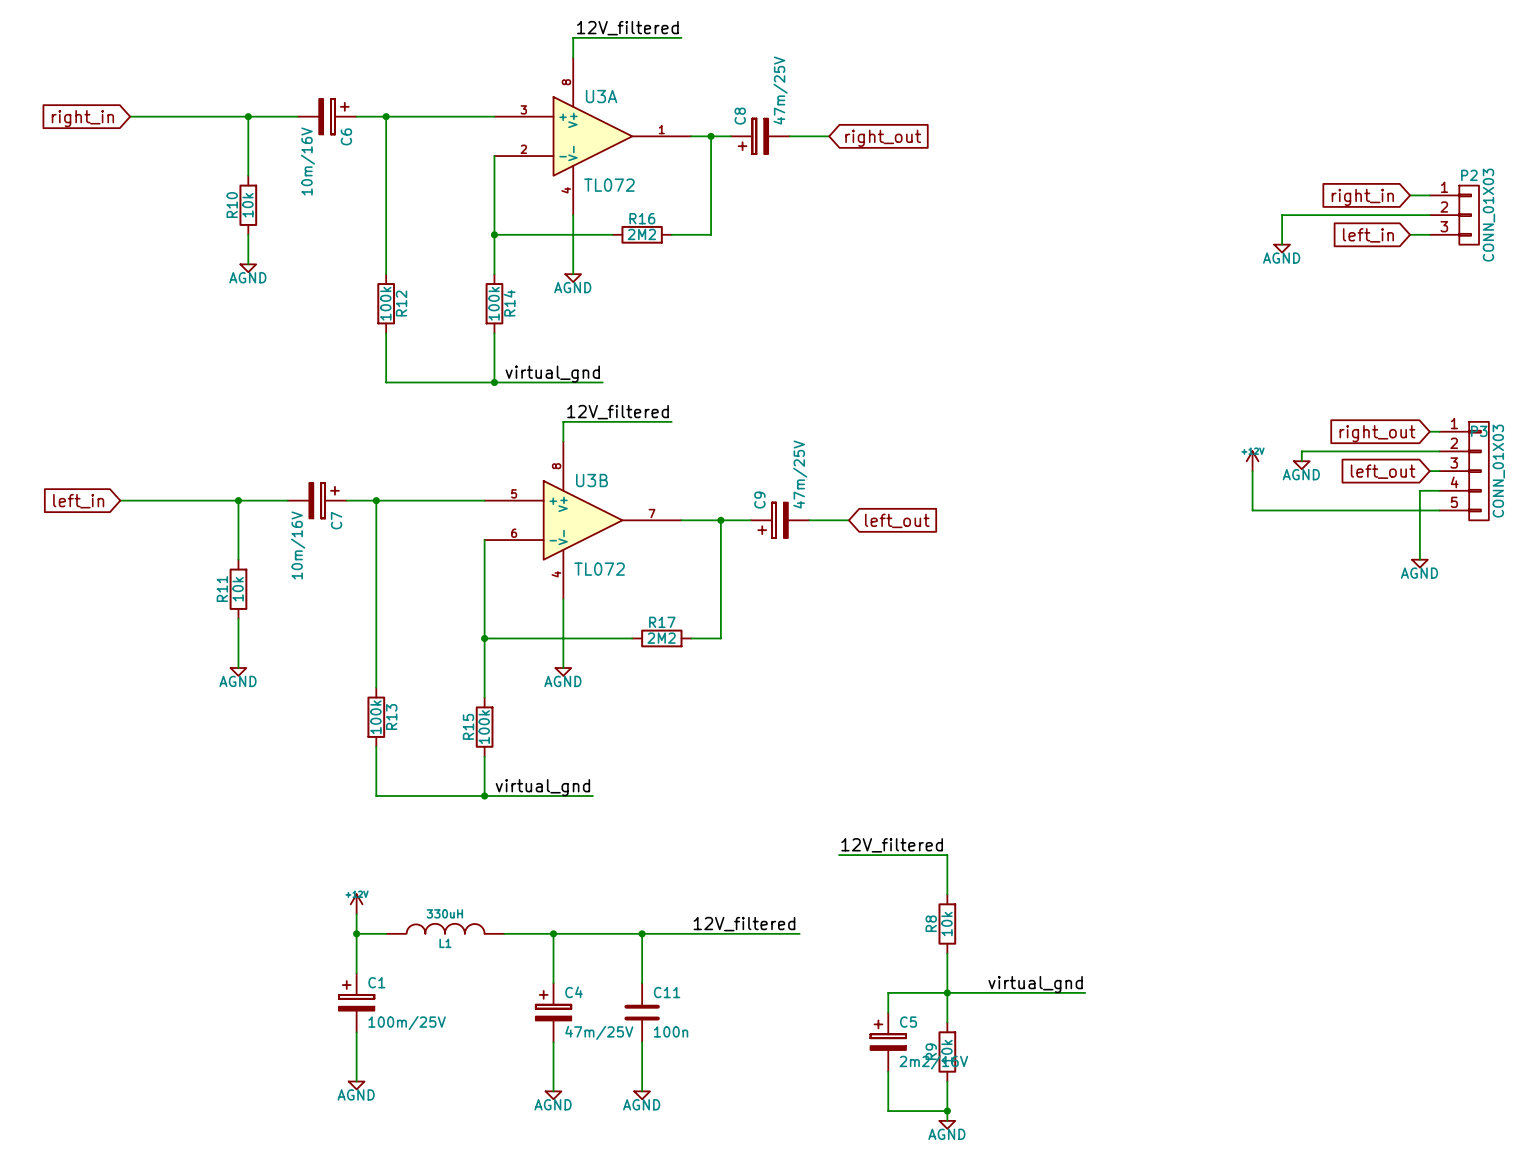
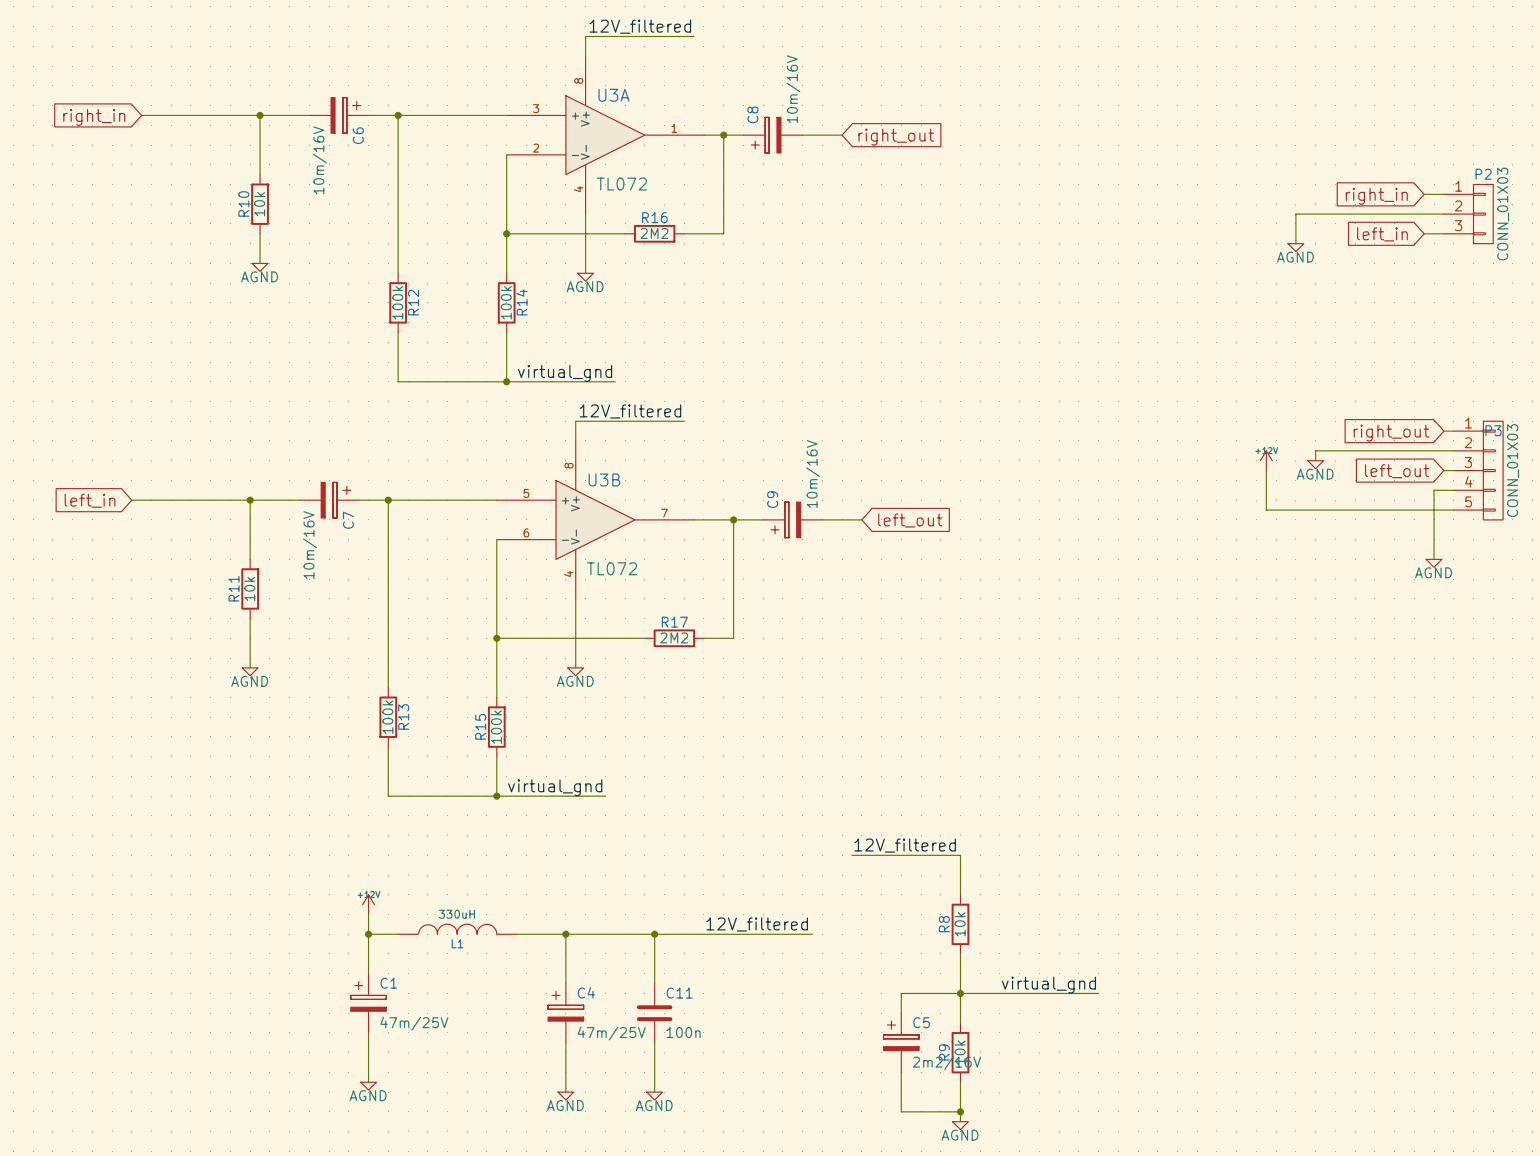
C8 value: 47m/25V (780, 90) -> 10m/16V (793, 89)
C9 value: 47m/25V (800, 474) -> 10m/16V (813, 474)
C1 value: 100m/25V (407, 1023) -> 47m/25V (414, 1023)

